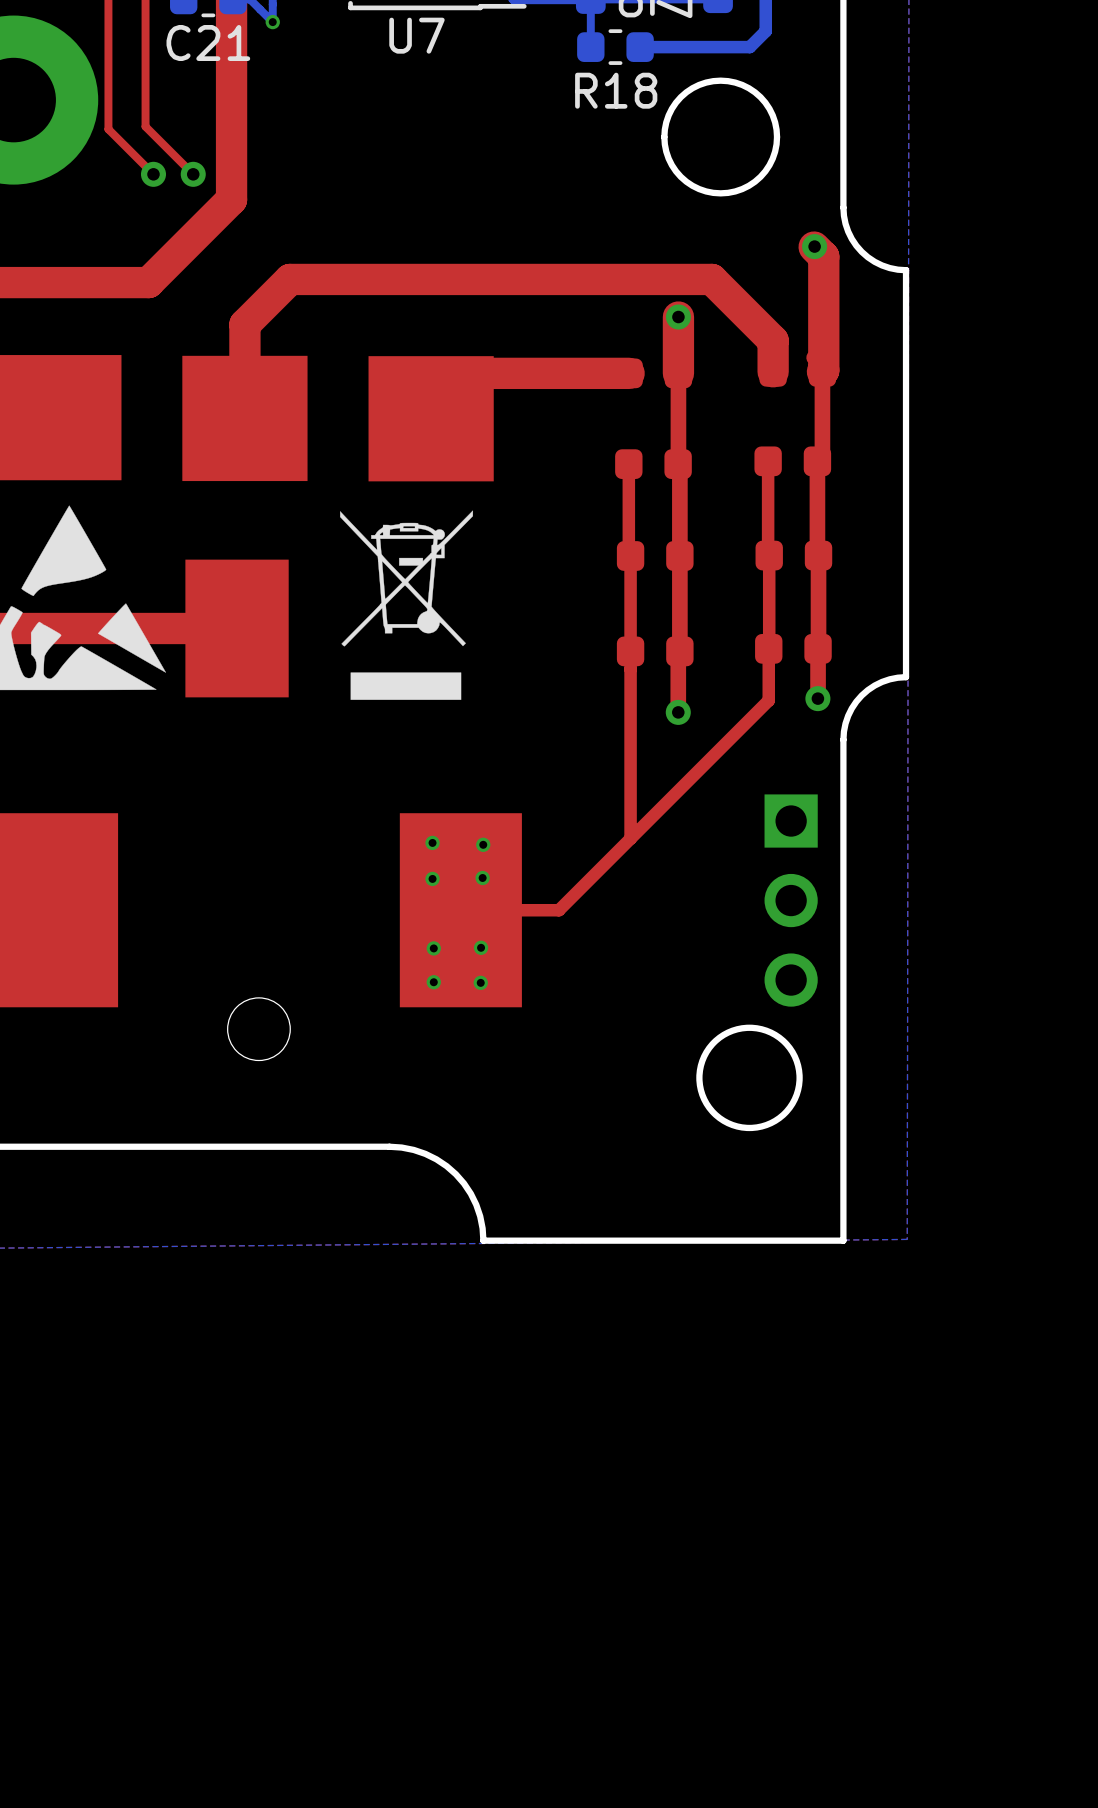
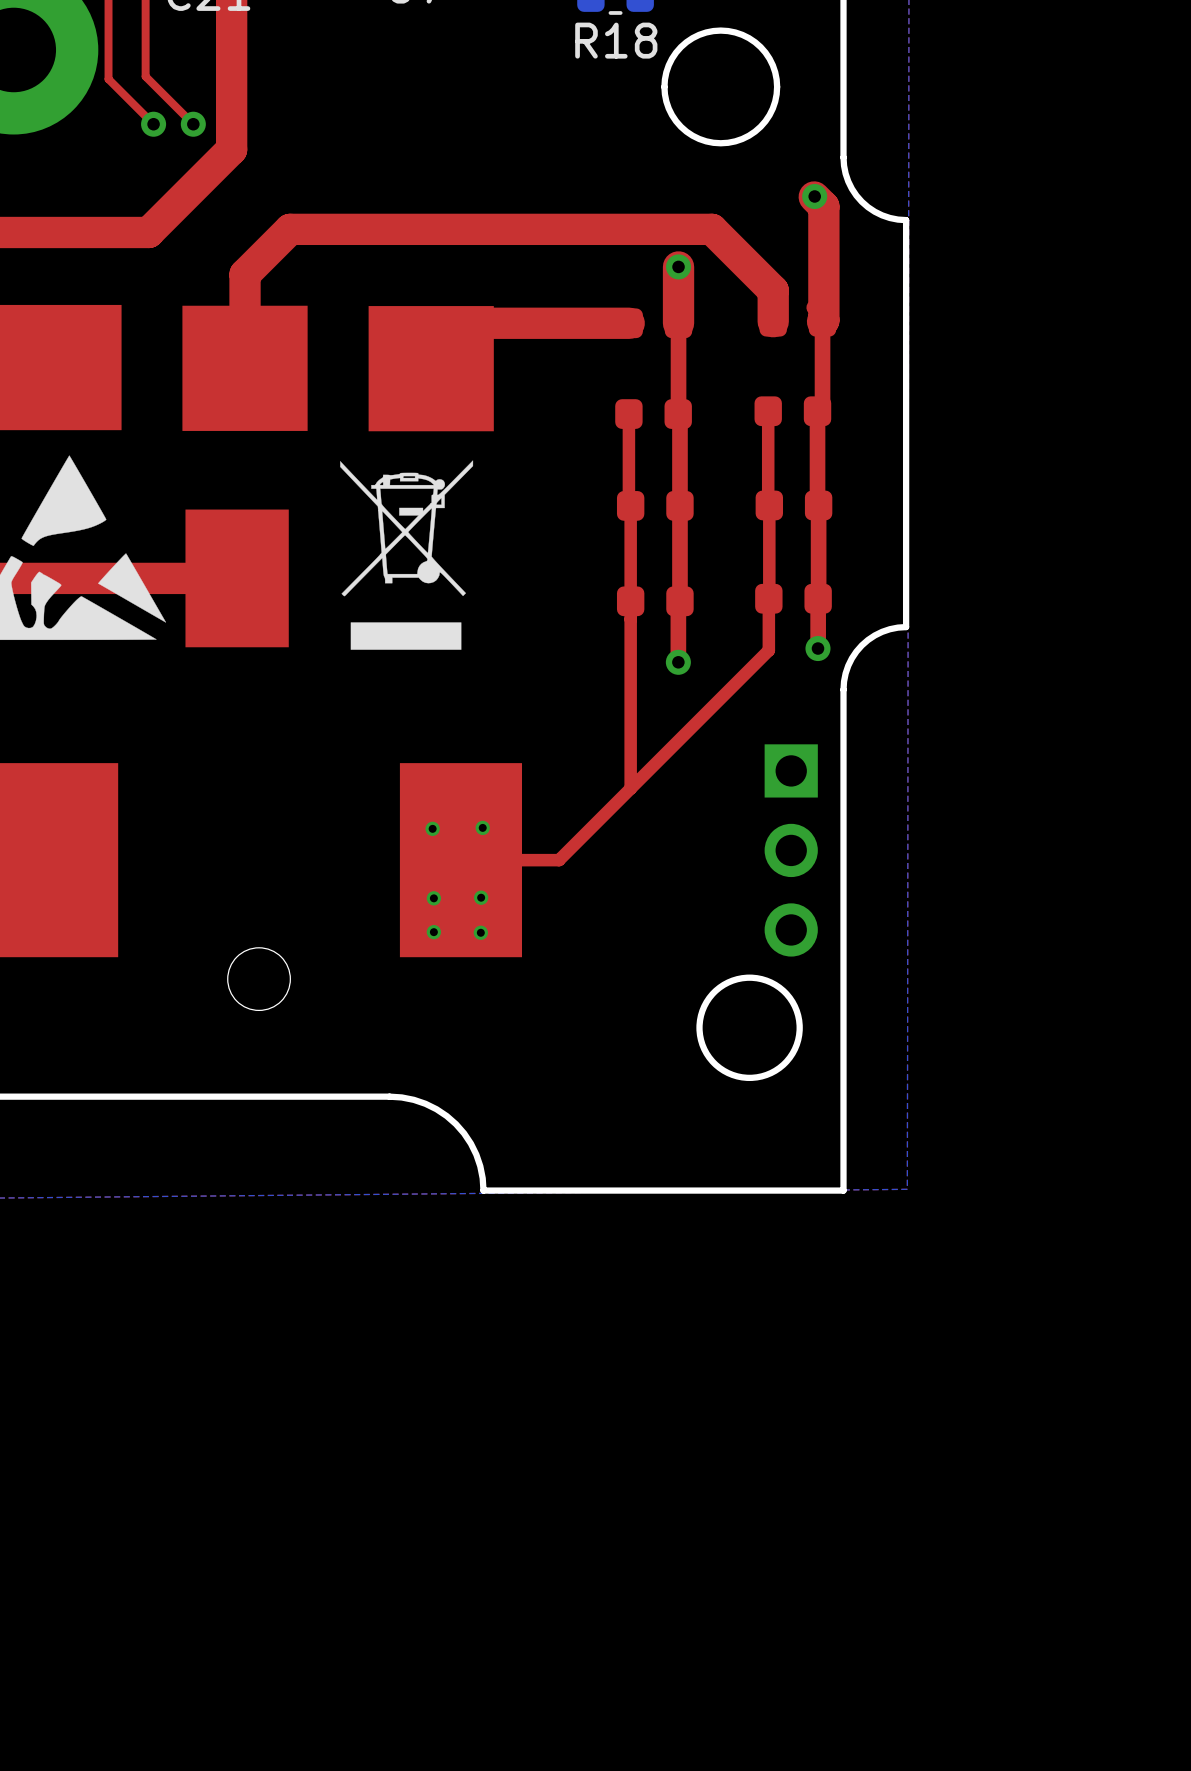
via: (432, 842) -> none
via: (483, 844) -> none

